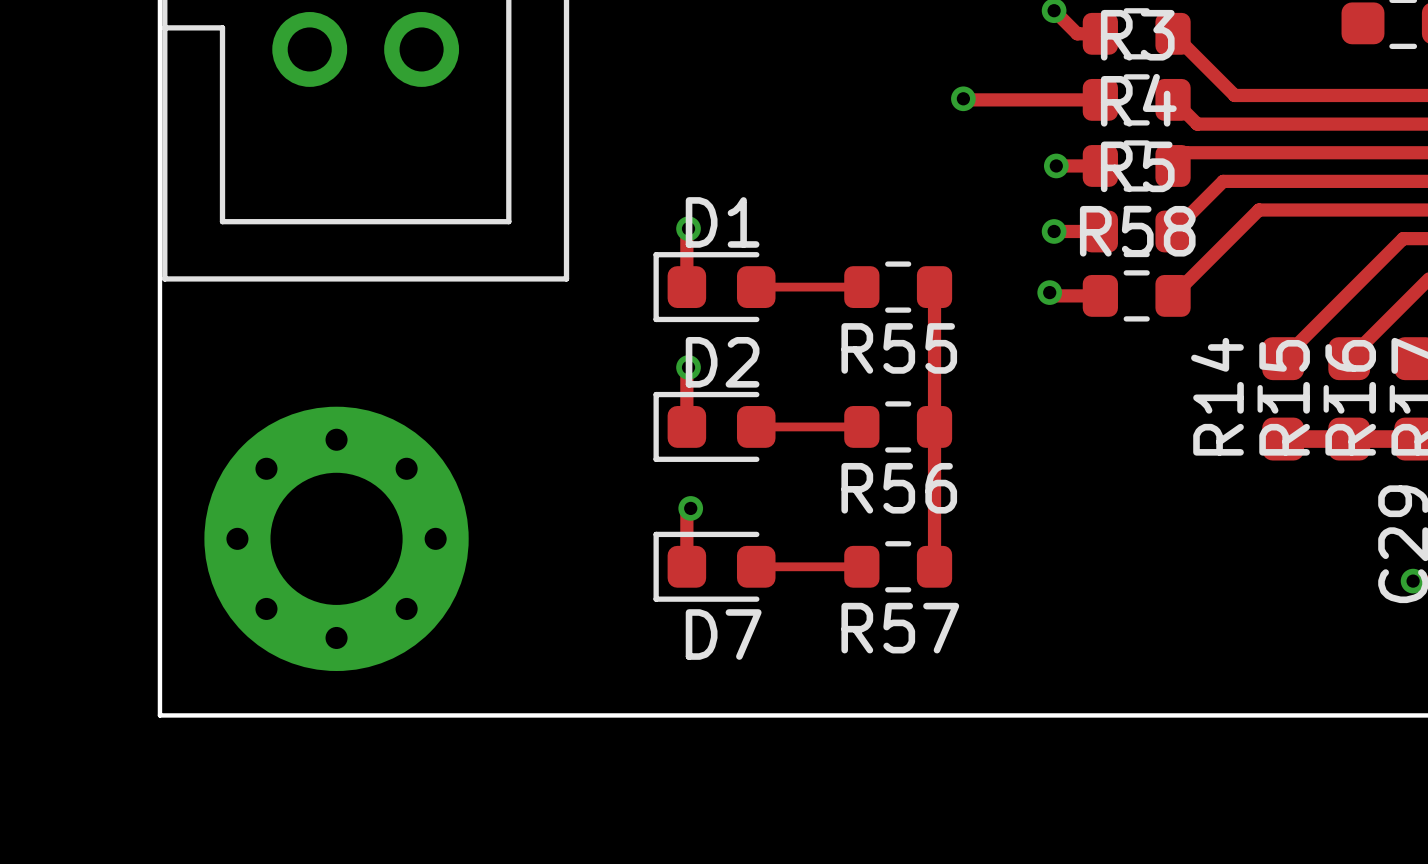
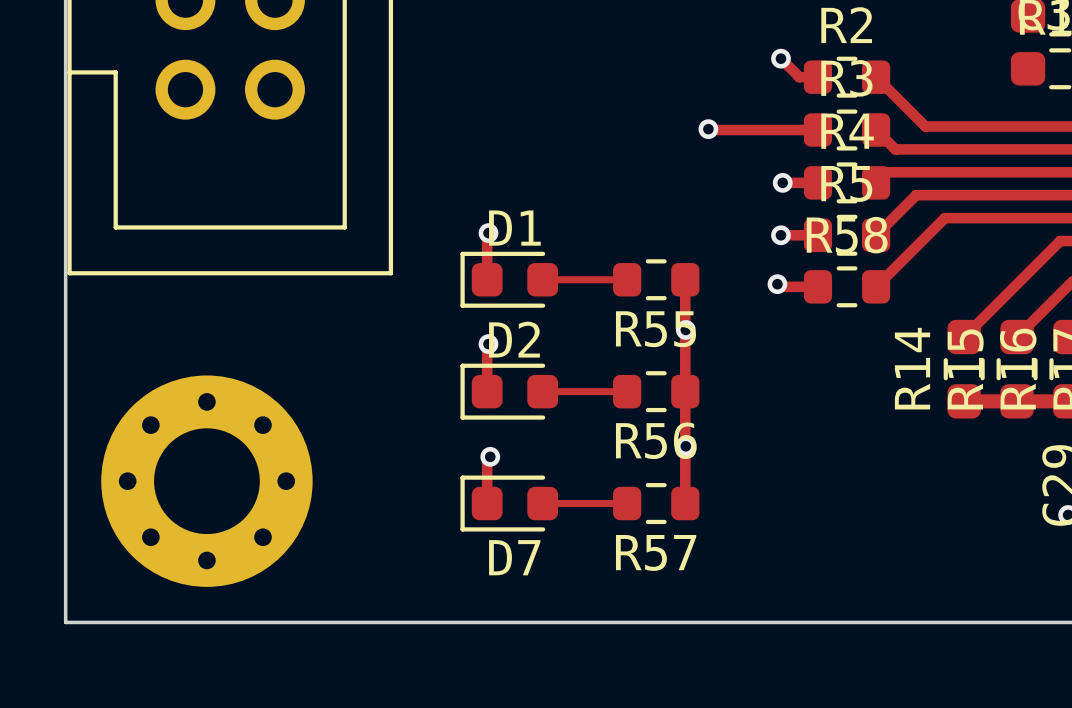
via: none -> (685, 329)
via: none -> (685, 446)

